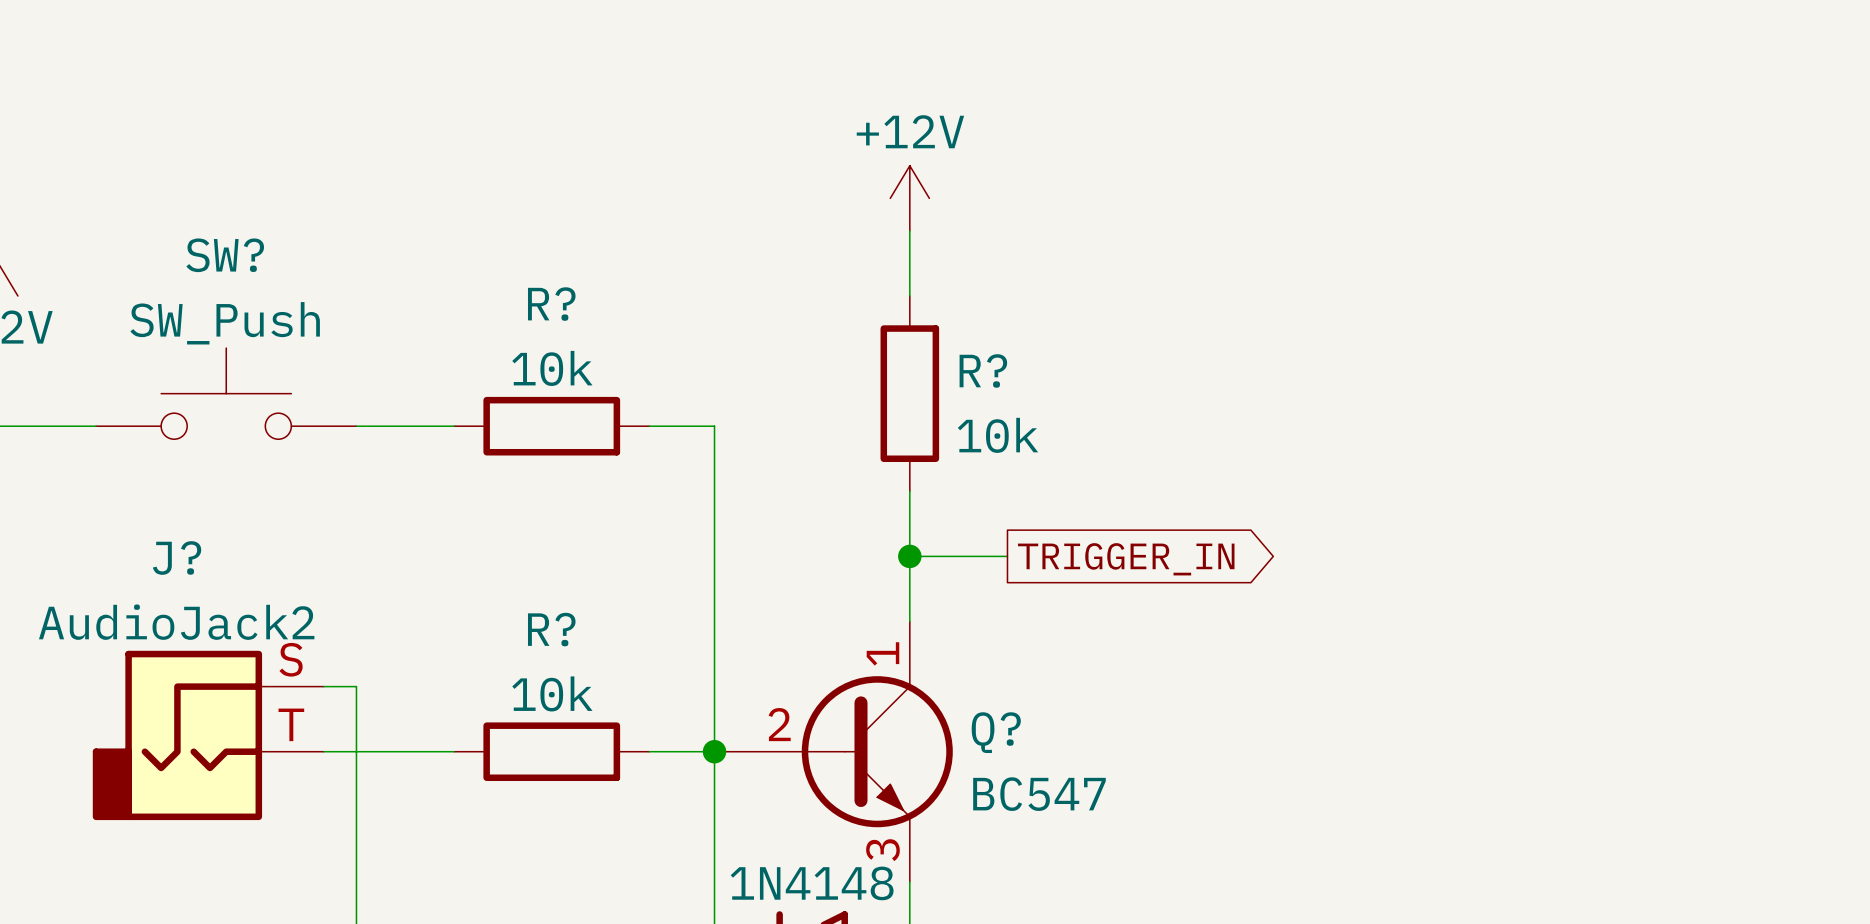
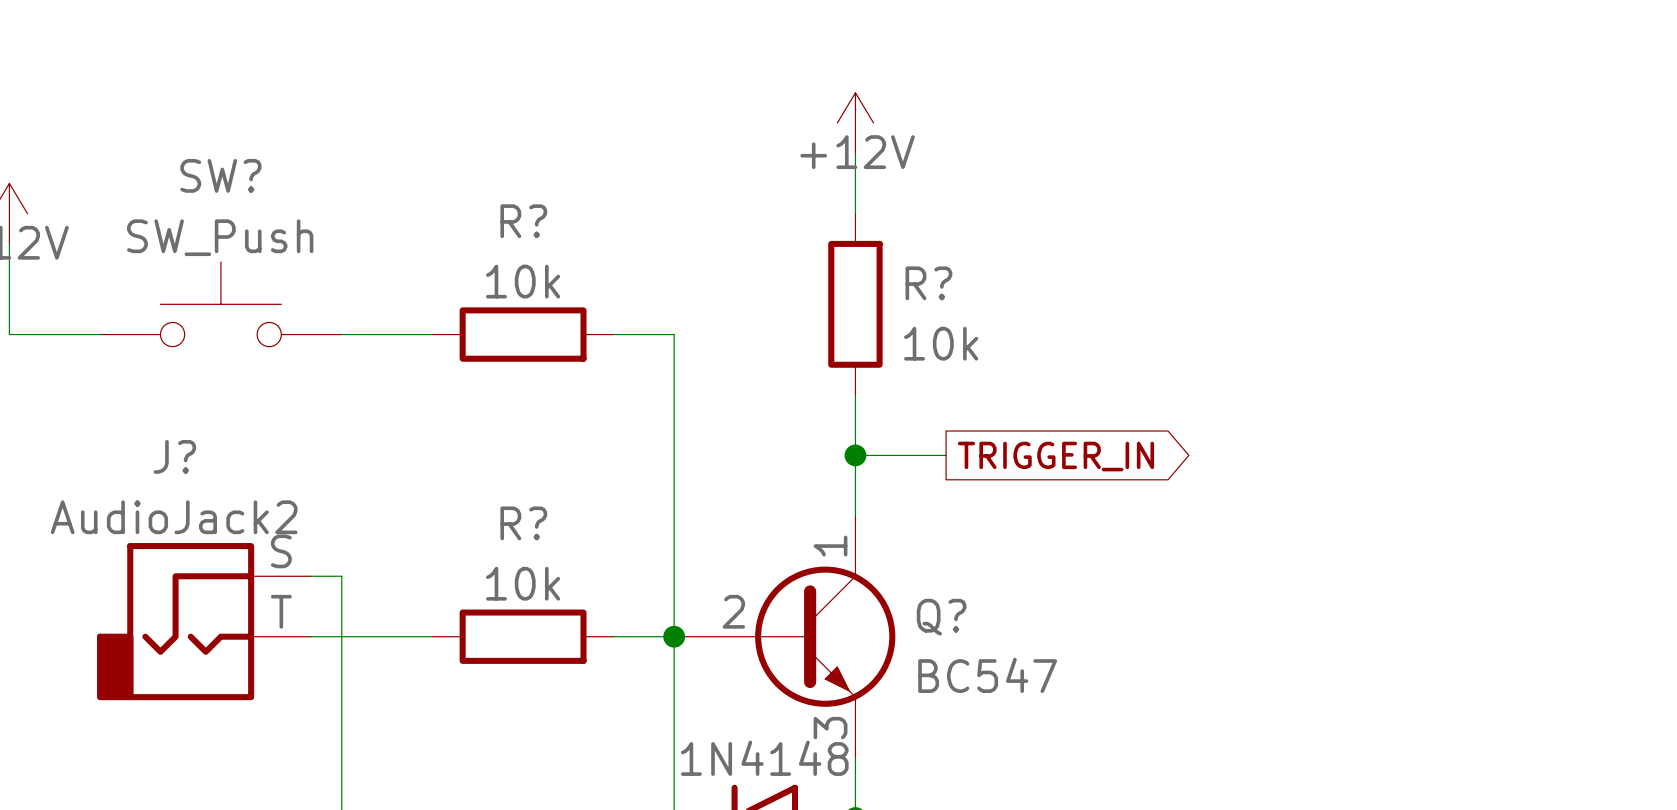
power symbol text position: +12V (910, 131) -> +12V (857, 152)

